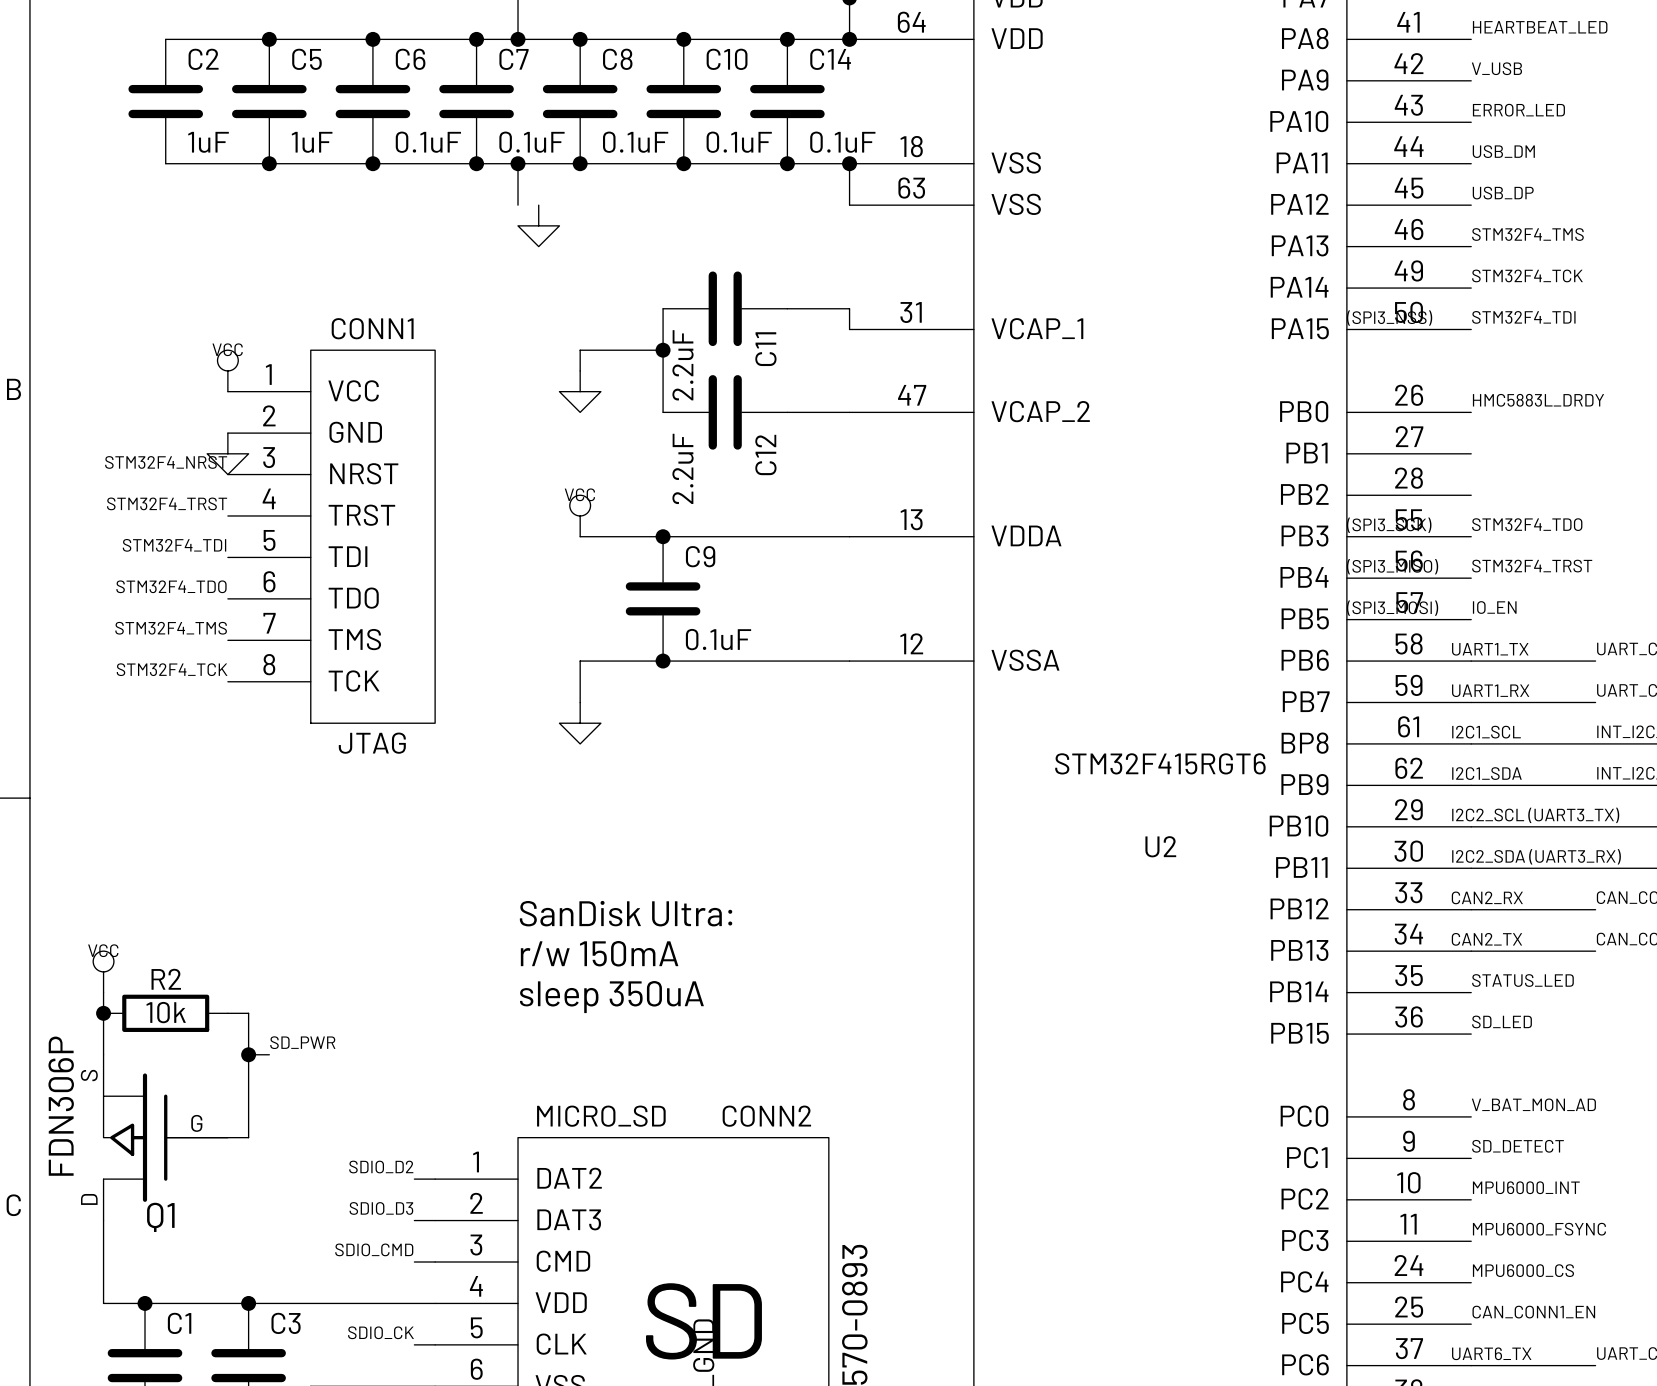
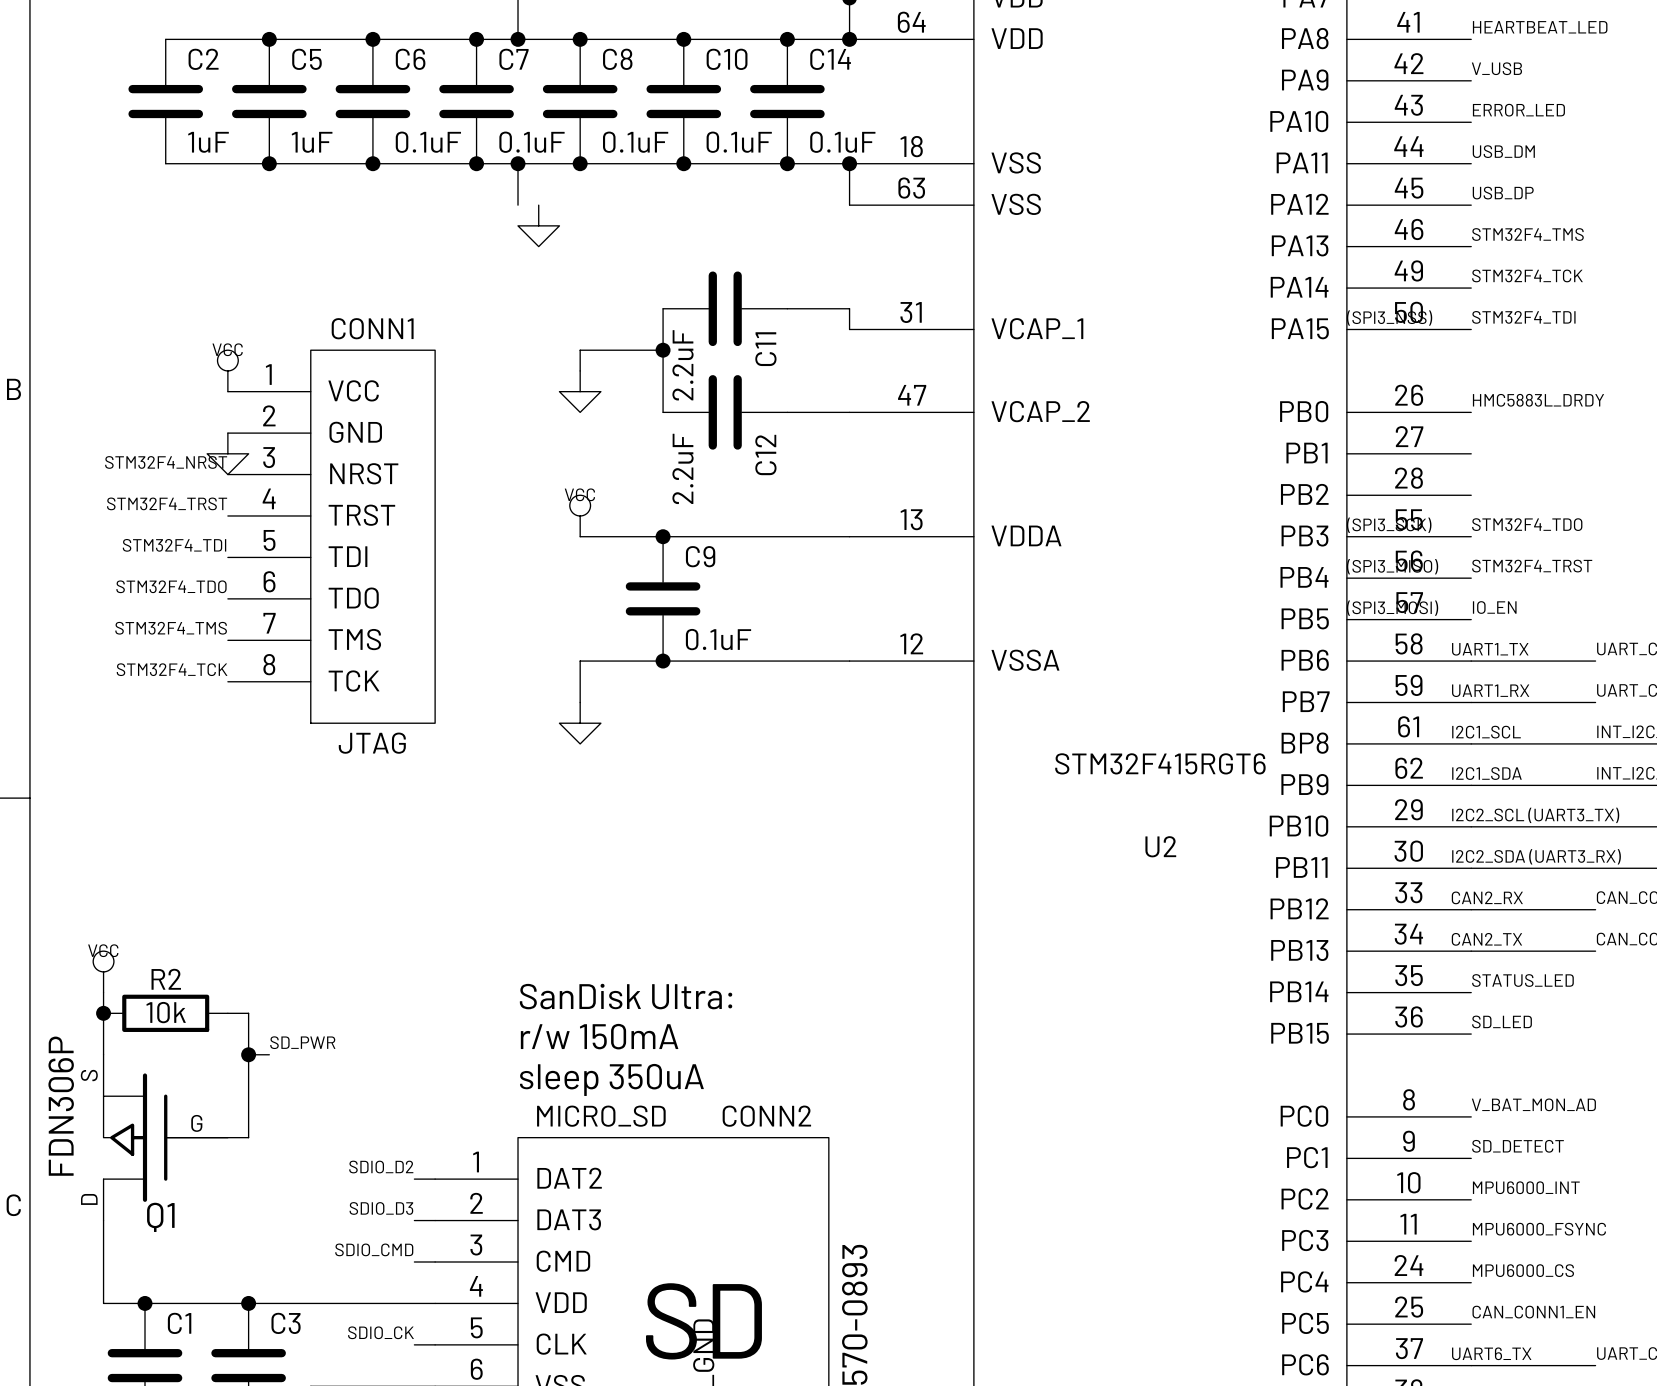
text: SanDisk Ultra: (626, 913) -> none
text position: r/w 150mA (599, 953) -> r/w 150mA (599, 1036)
text: sleep 350uA (611, 997) -> SanDisk Ultra: (626, 996)
text: none -> sleep 350uA (611, 1079)

